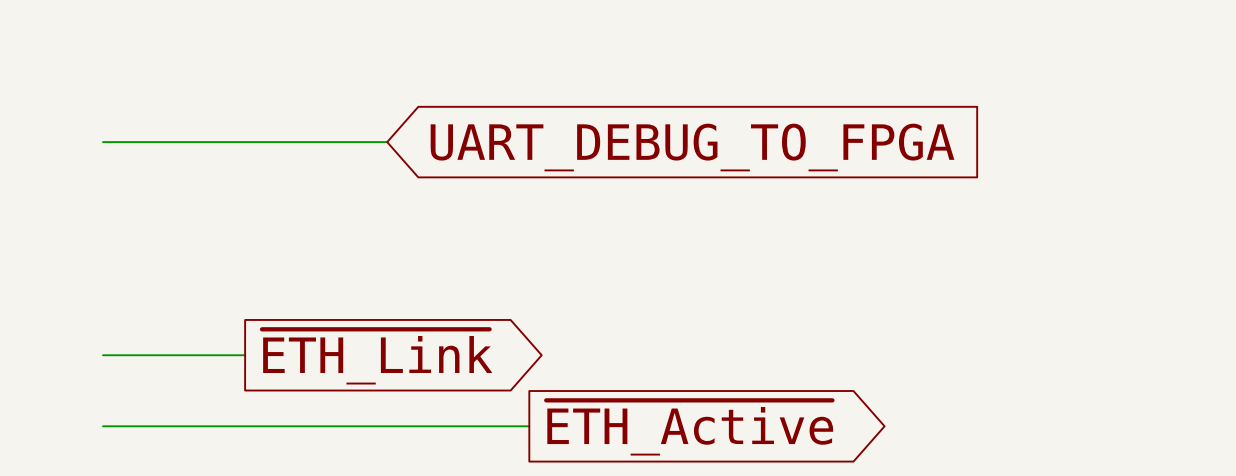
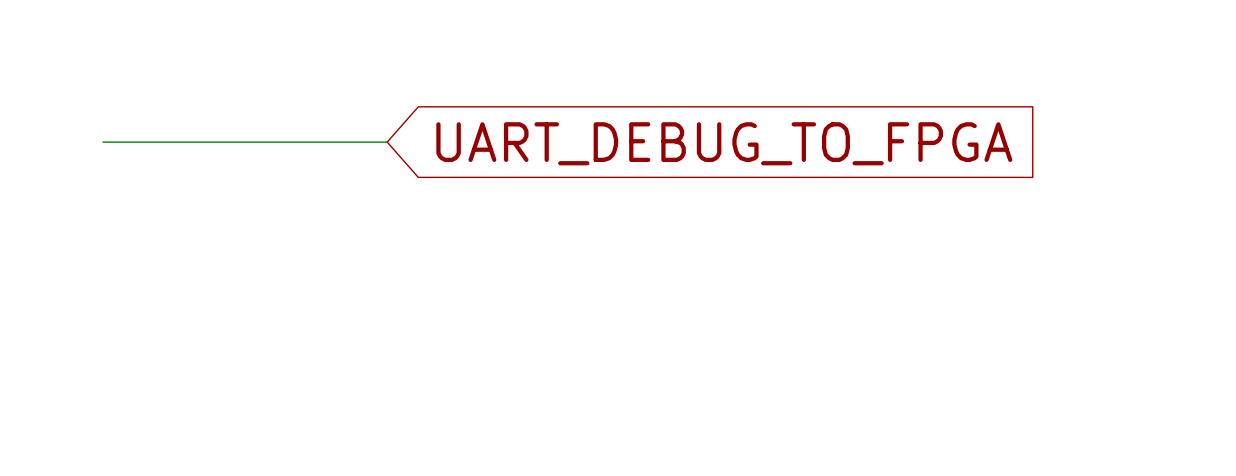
wire: (103, 355) (245, 355) -> none
global label: ~{ETH_Link} (377, 356) -> none
wire: (103, 426) (529, 426) -> none
global label: ~{ETH_Active} (689, 427) -> none

